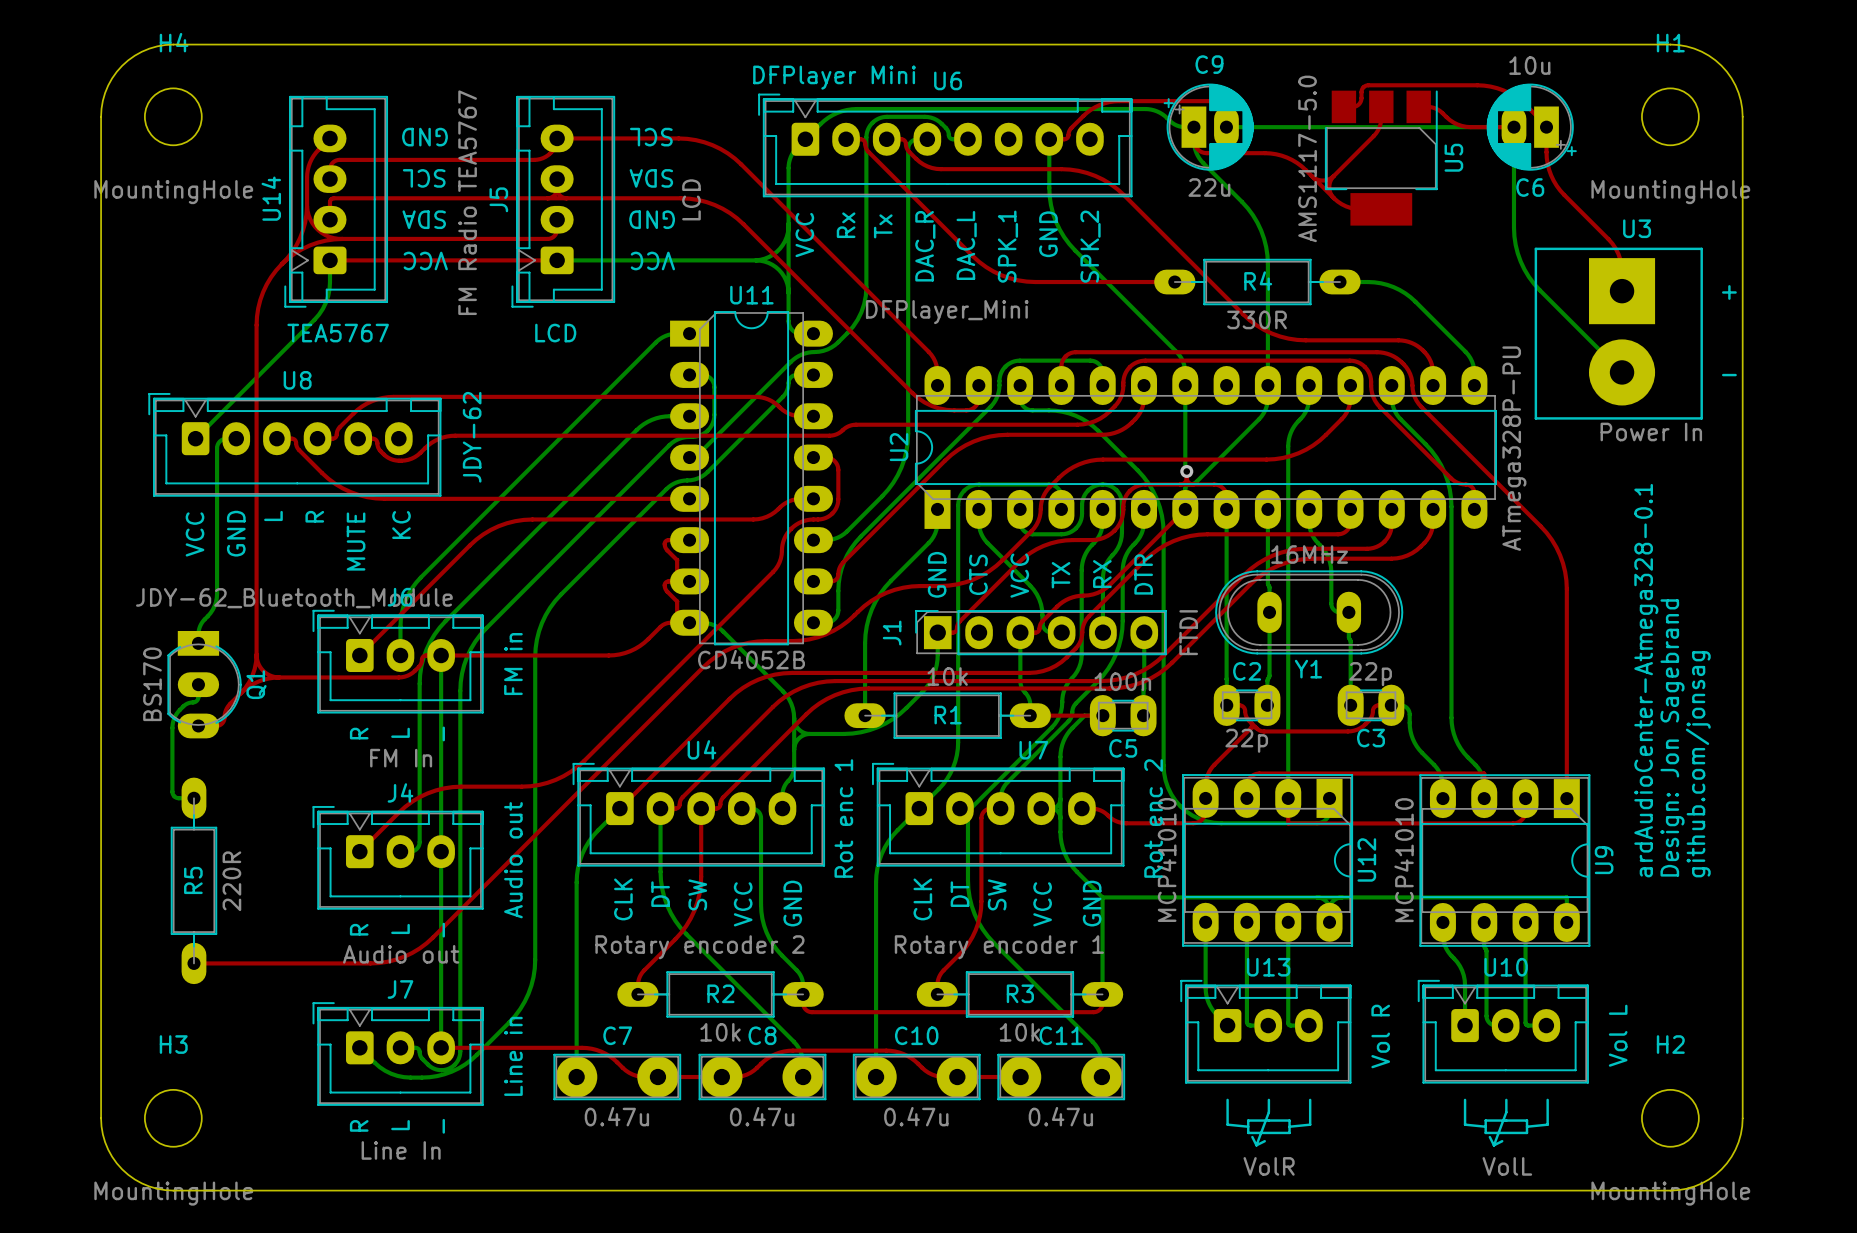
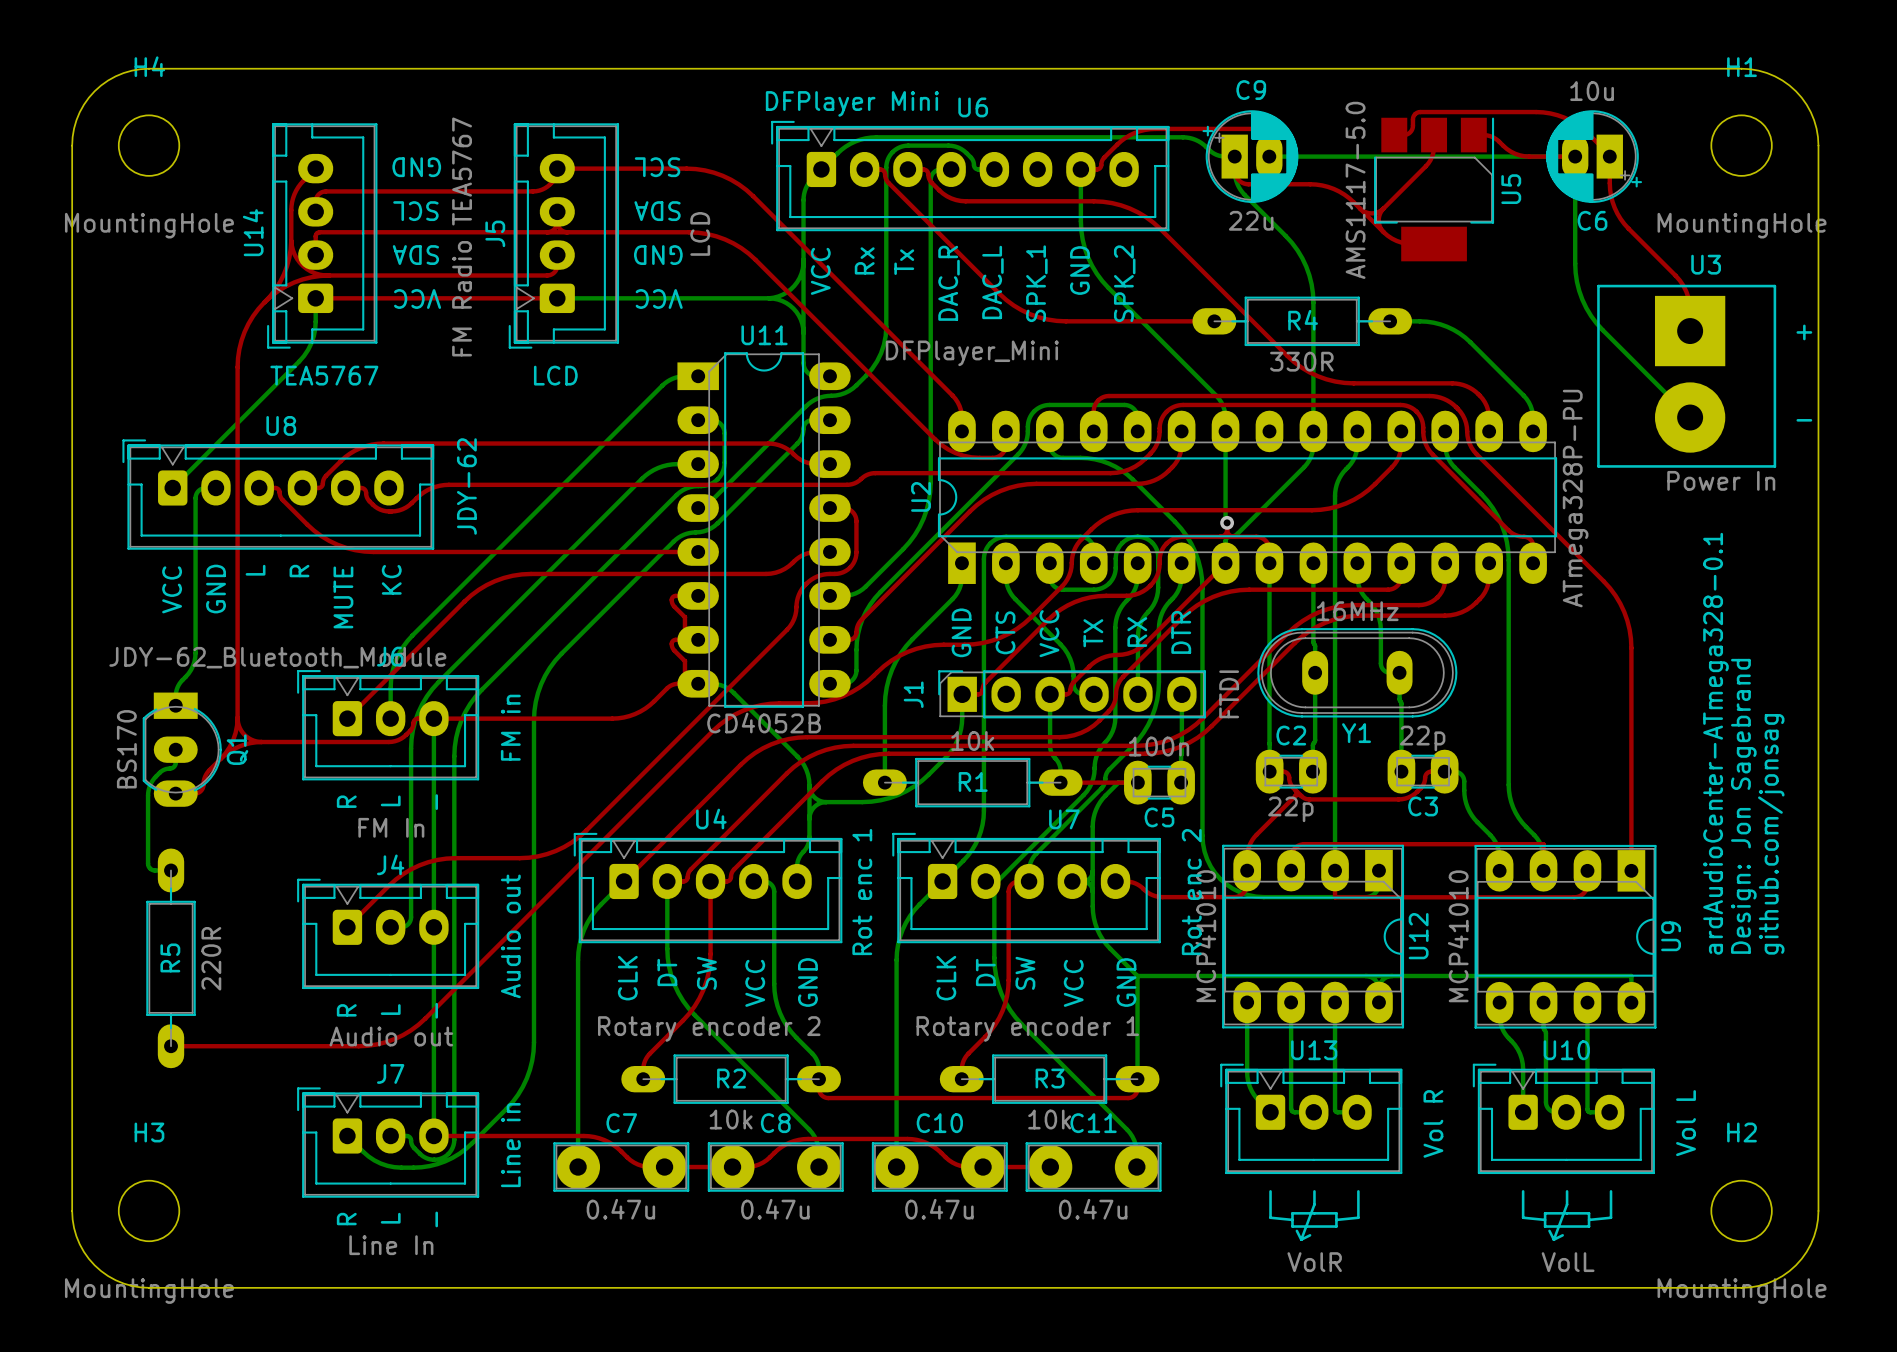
text: ardAudioCenter-Atmega328-0.1 (1646, 680) -> ardAudioCenter-ATmega328-0.1 (1715, 743)

